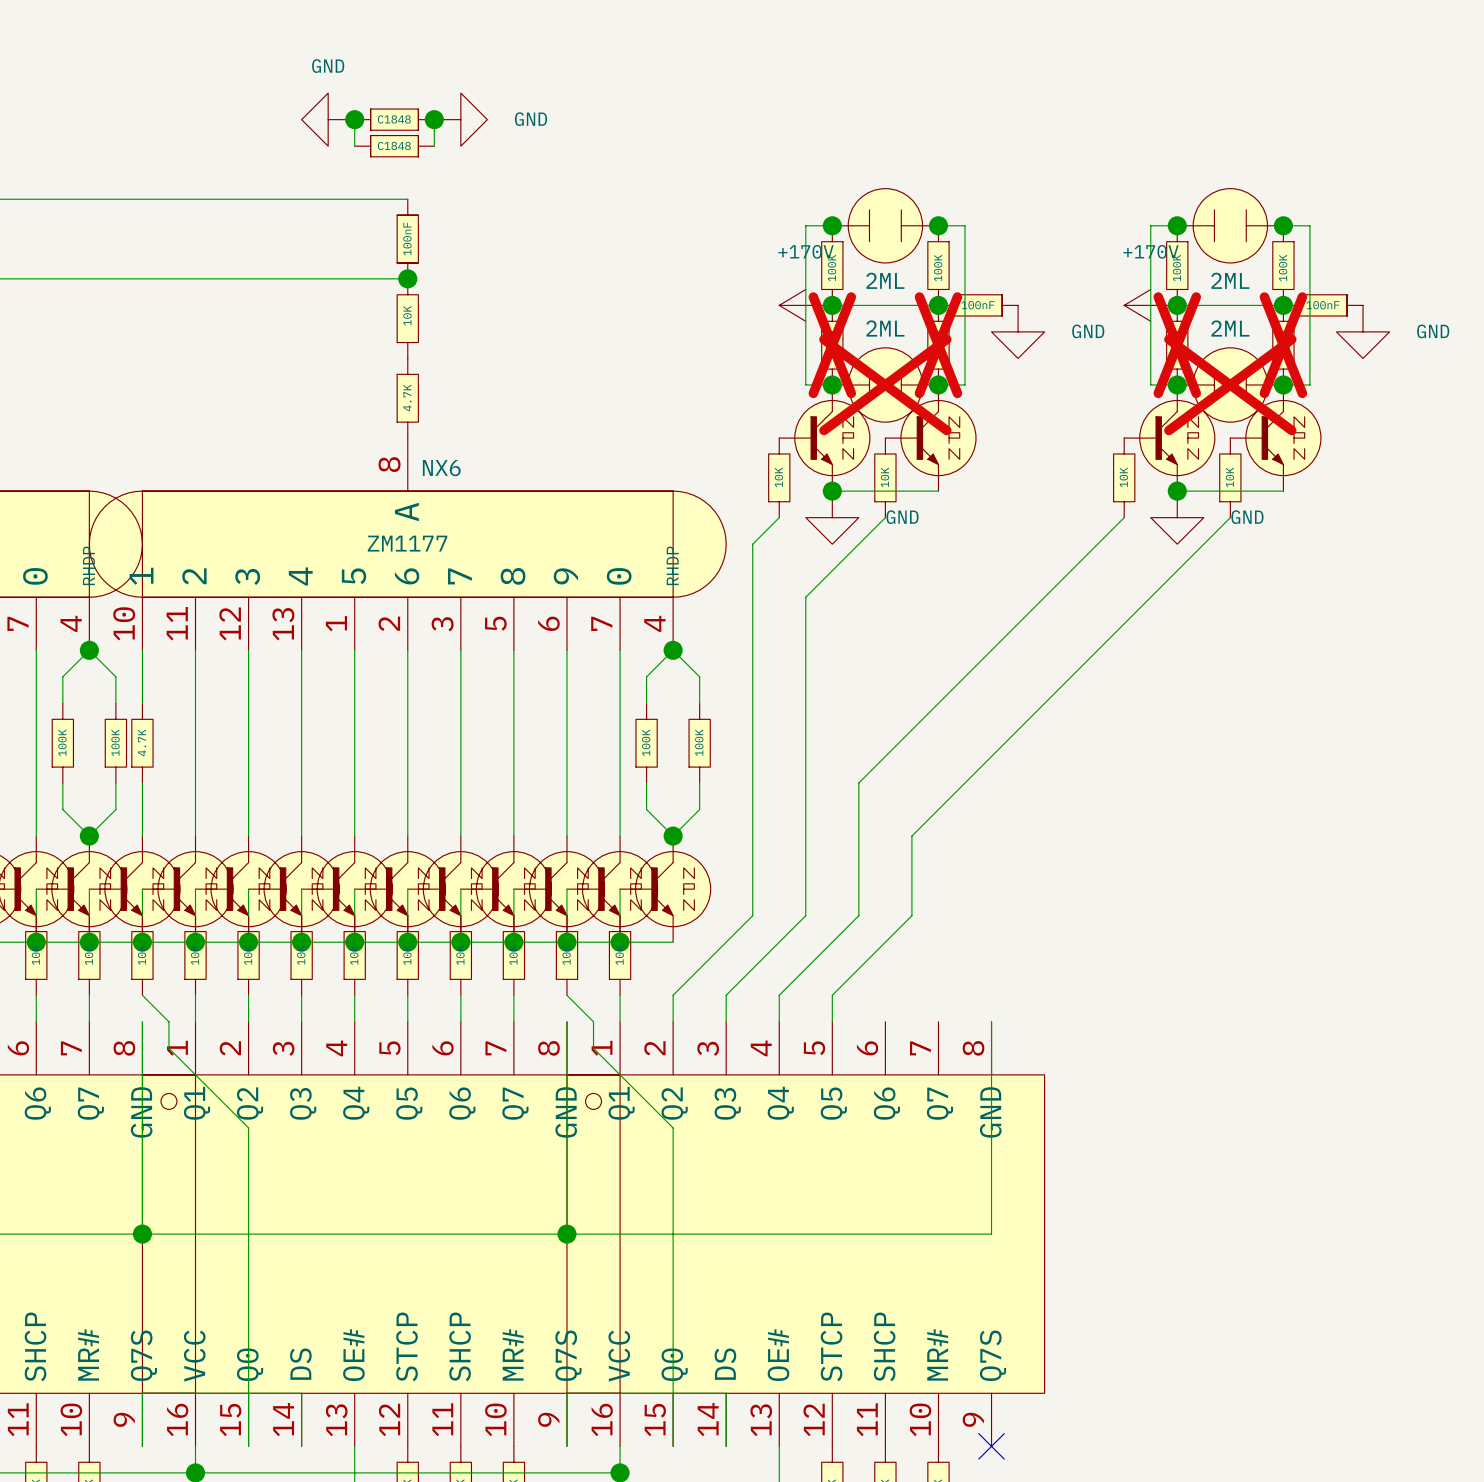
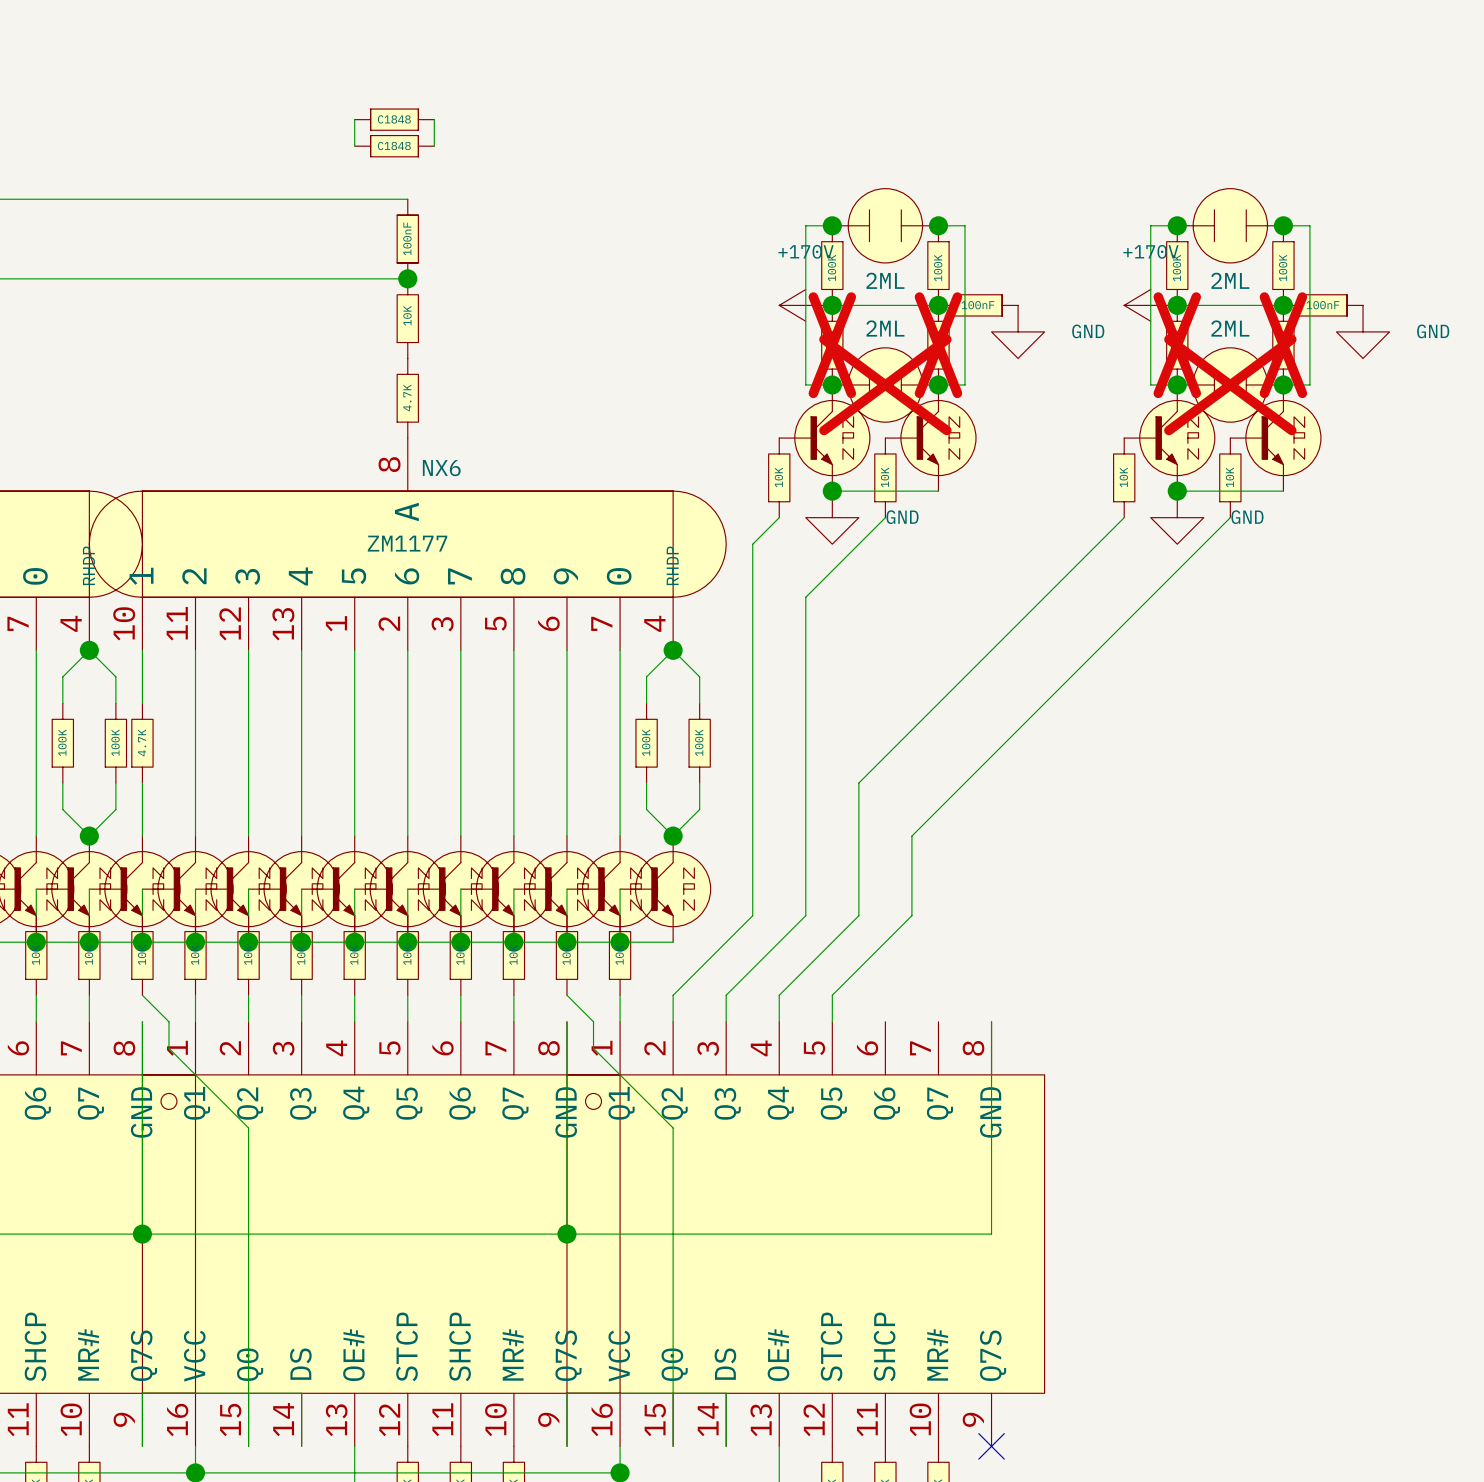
power symbol: GND (328, 119) -> none
junction: (354, 119) -> none
junction: (434, 119) -> none
power symbol: GND (460, 119) -> none

